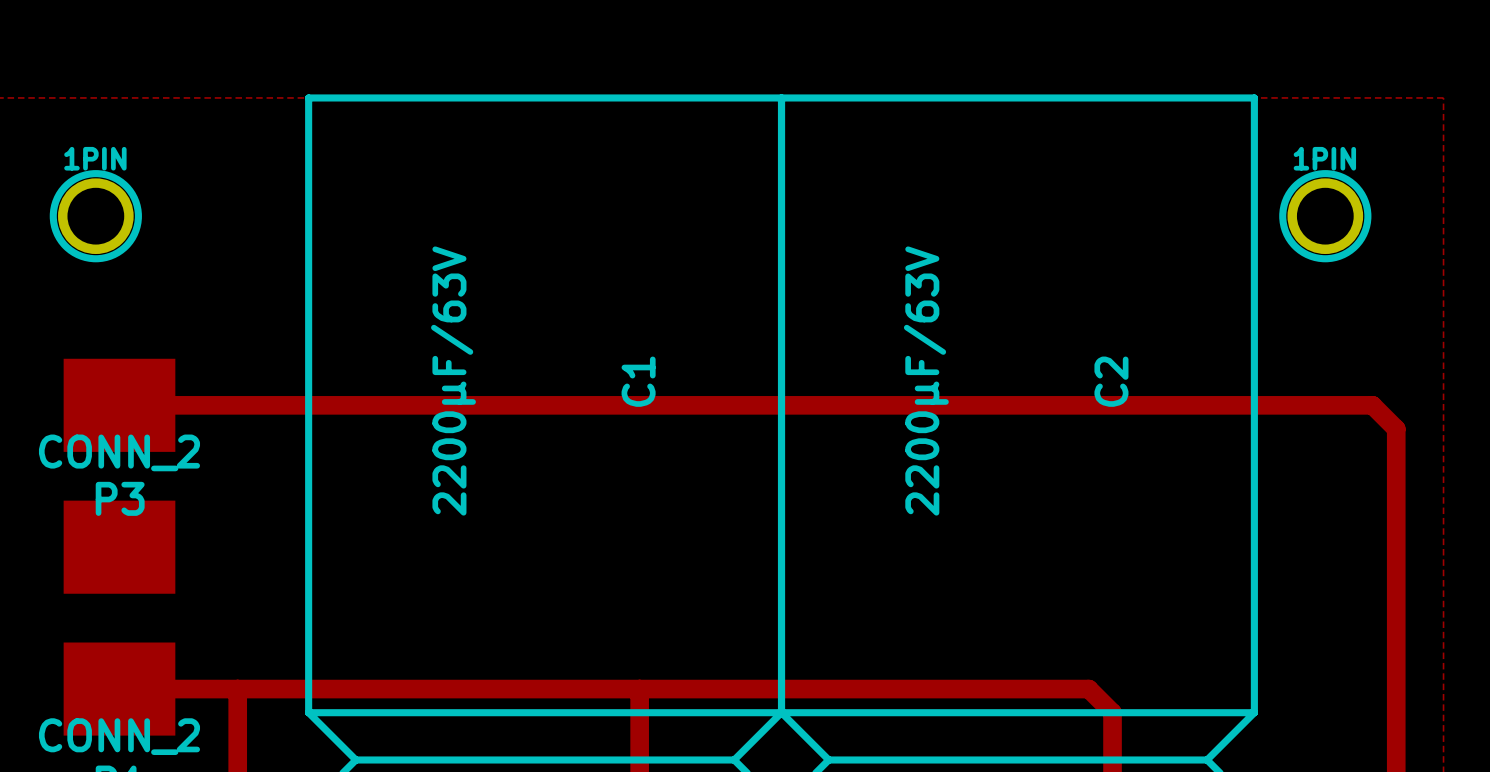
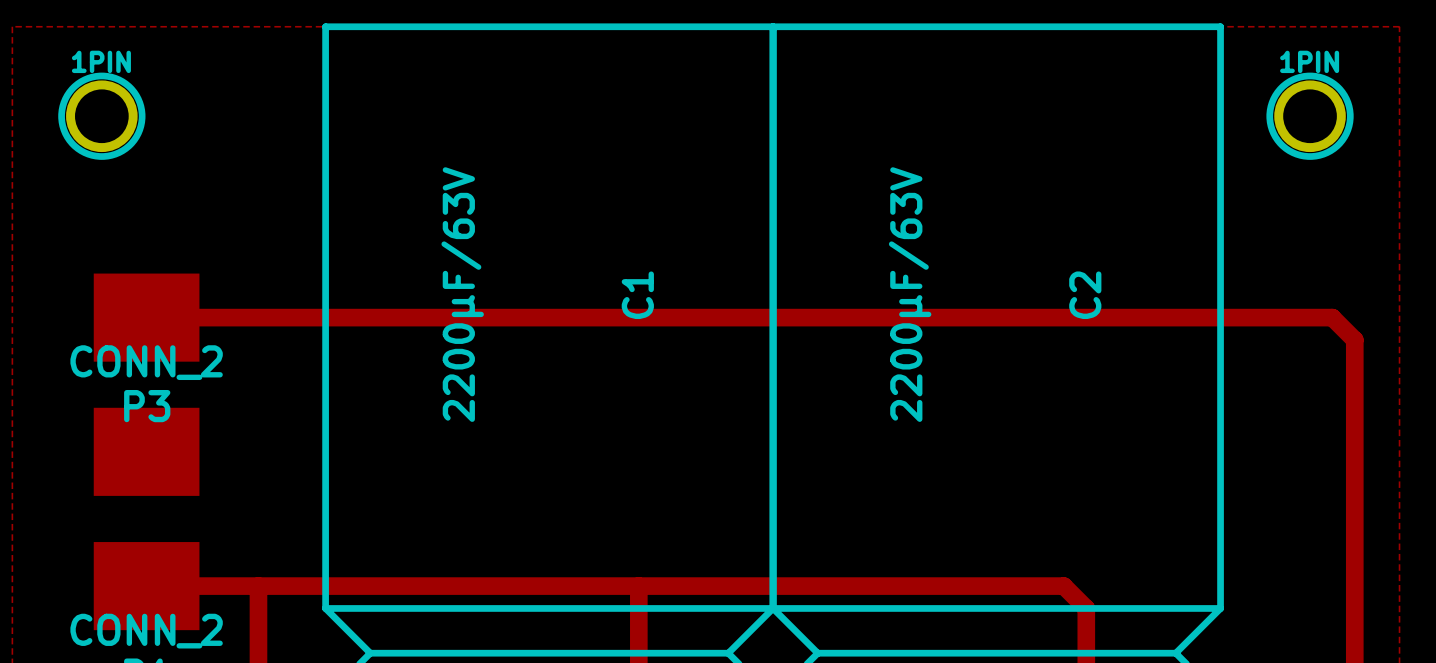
1PIN position: (95, 216) -> (101, 116)
1PIN position: (1325, 216) -> (1310, 116)

